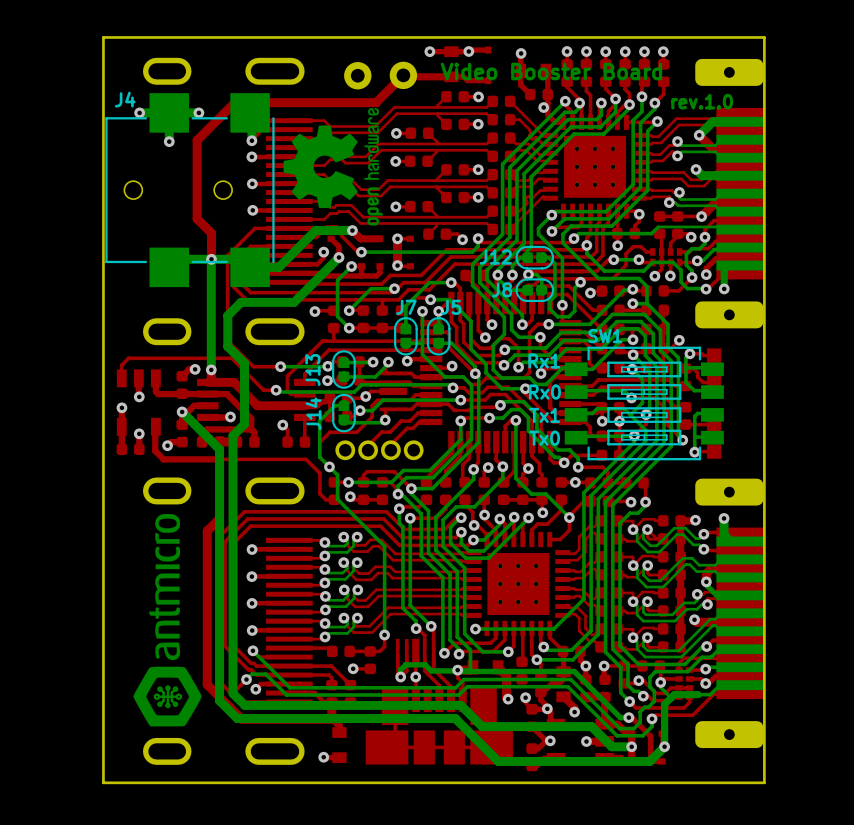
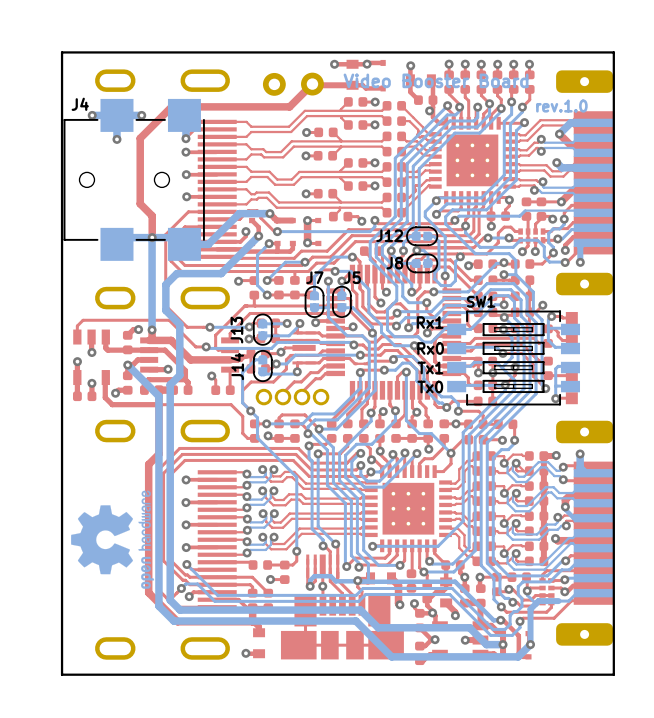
drawing: [283, 108, 384, 226] -> none
drawing shape: [133, 513, 202, 727] -> [71, 490, 155, 589]

